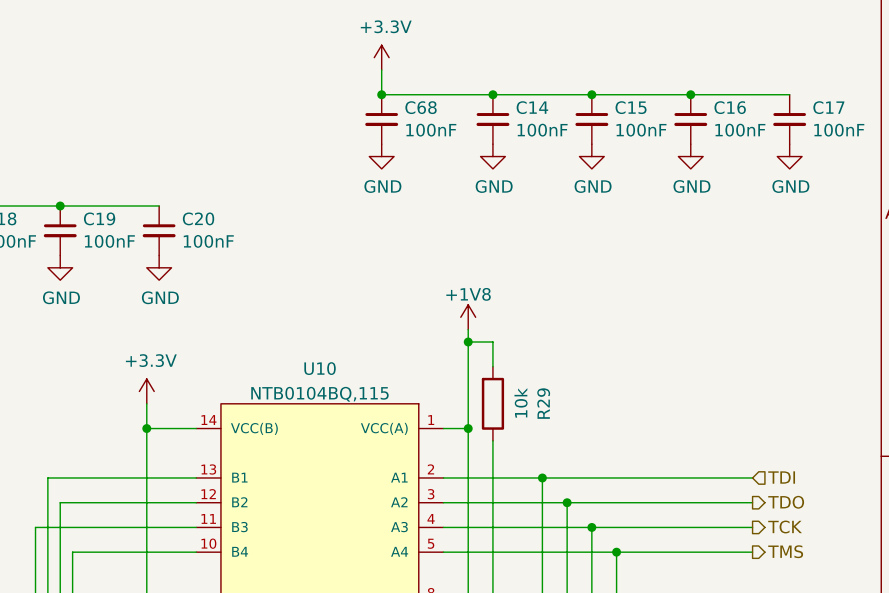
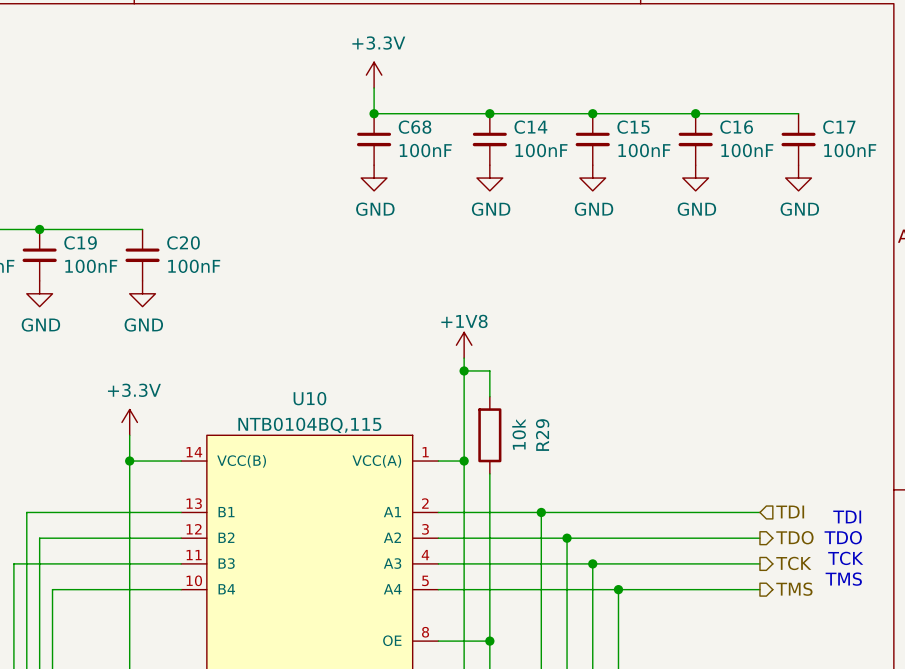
text: none -> TDI (847, 516)
text: none -> TDO (843, 537)
text: none -> TCK (845, 558)
text: none -> TMS (843, 579)

